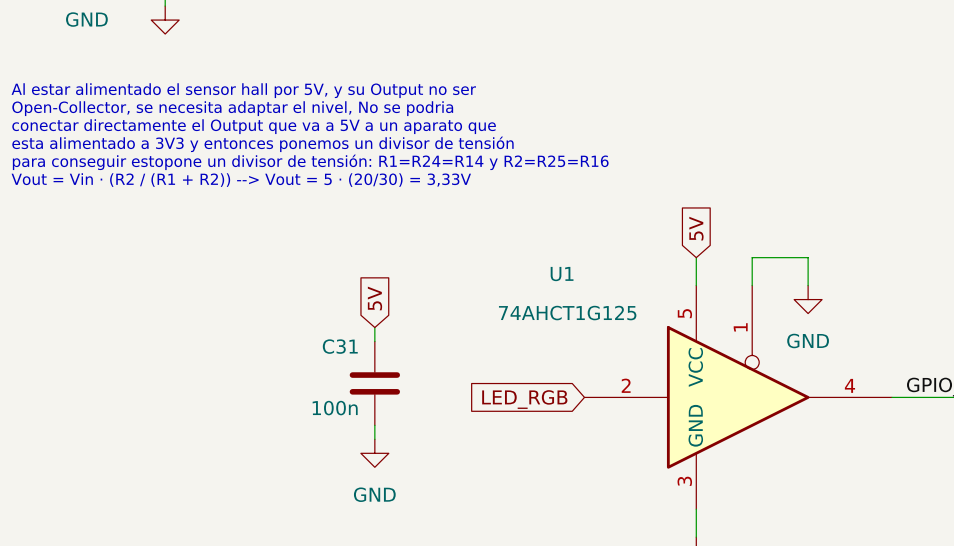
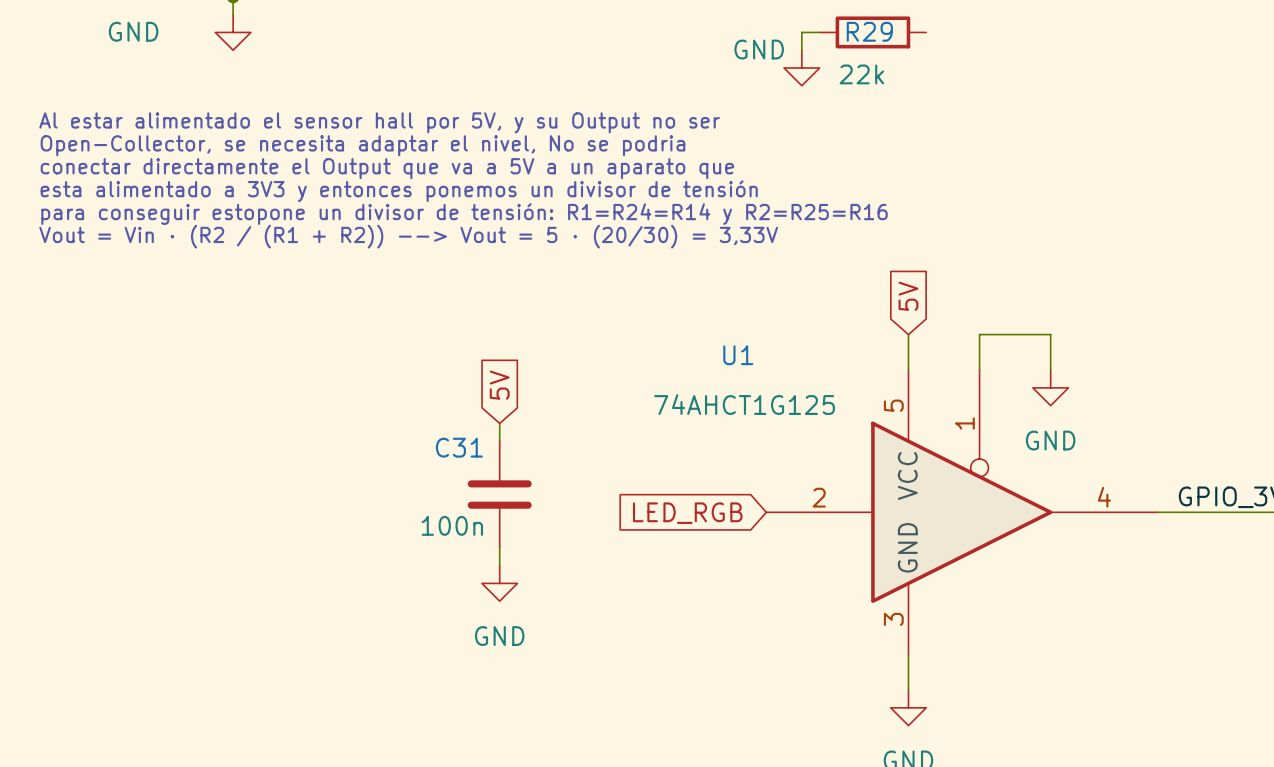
wire: none -> (819, 32) (801, 32) (801, 50)
R29: none -> 22k (872, 32)
power symbol: none -> GND (801, 67)

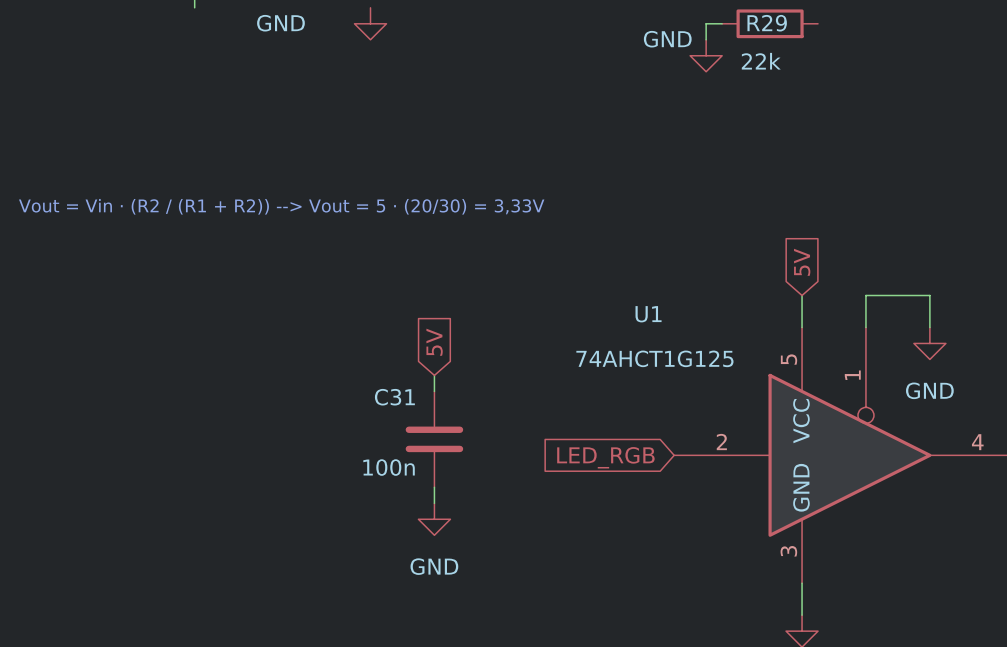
power symbol position: GND (233, 32) -> GND (370, 23)
text: Al estar alimentado el sensor hall por 5V, y su Output no ser (379, 122) -> none
text: Open-Collector, se necesita adaptar el nivel, No se podria (362, 145) -> none
text: conectar directamente el Output que va a 5V a un aparato que (387, 168) -> none
text: esta alimentado a 3V3 y entonces ponemos un divisor de tensión (399, 191) -> none
text: para conseguir estopone un divisor de tensión: R1=R24=R14 y R2=R25=R16 (464, 214) -> none

